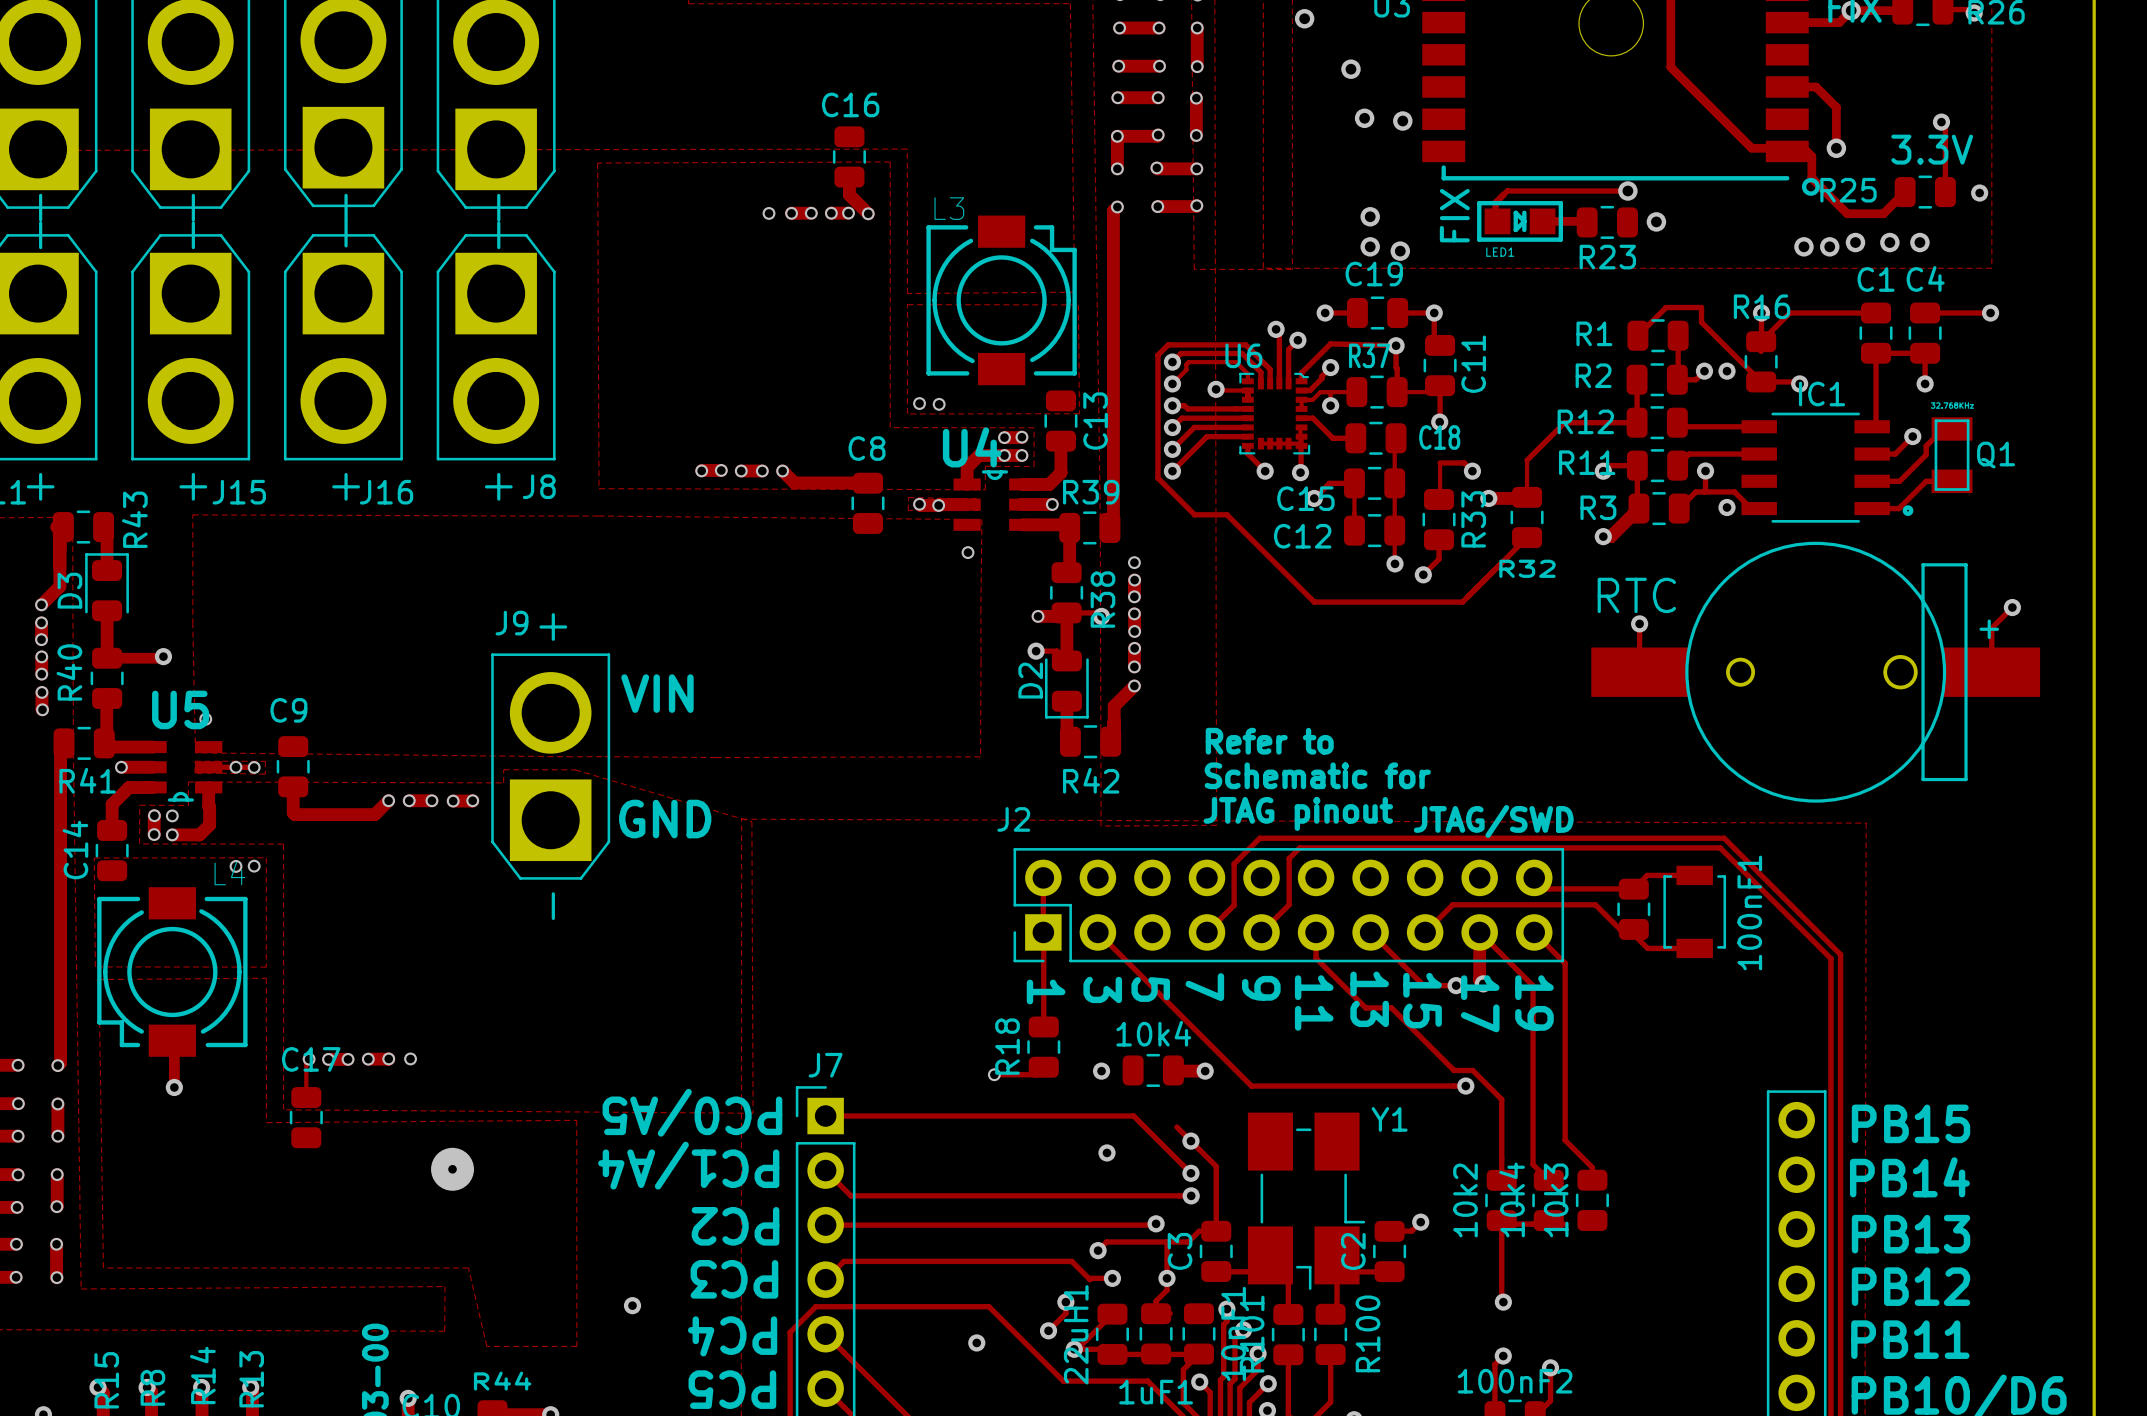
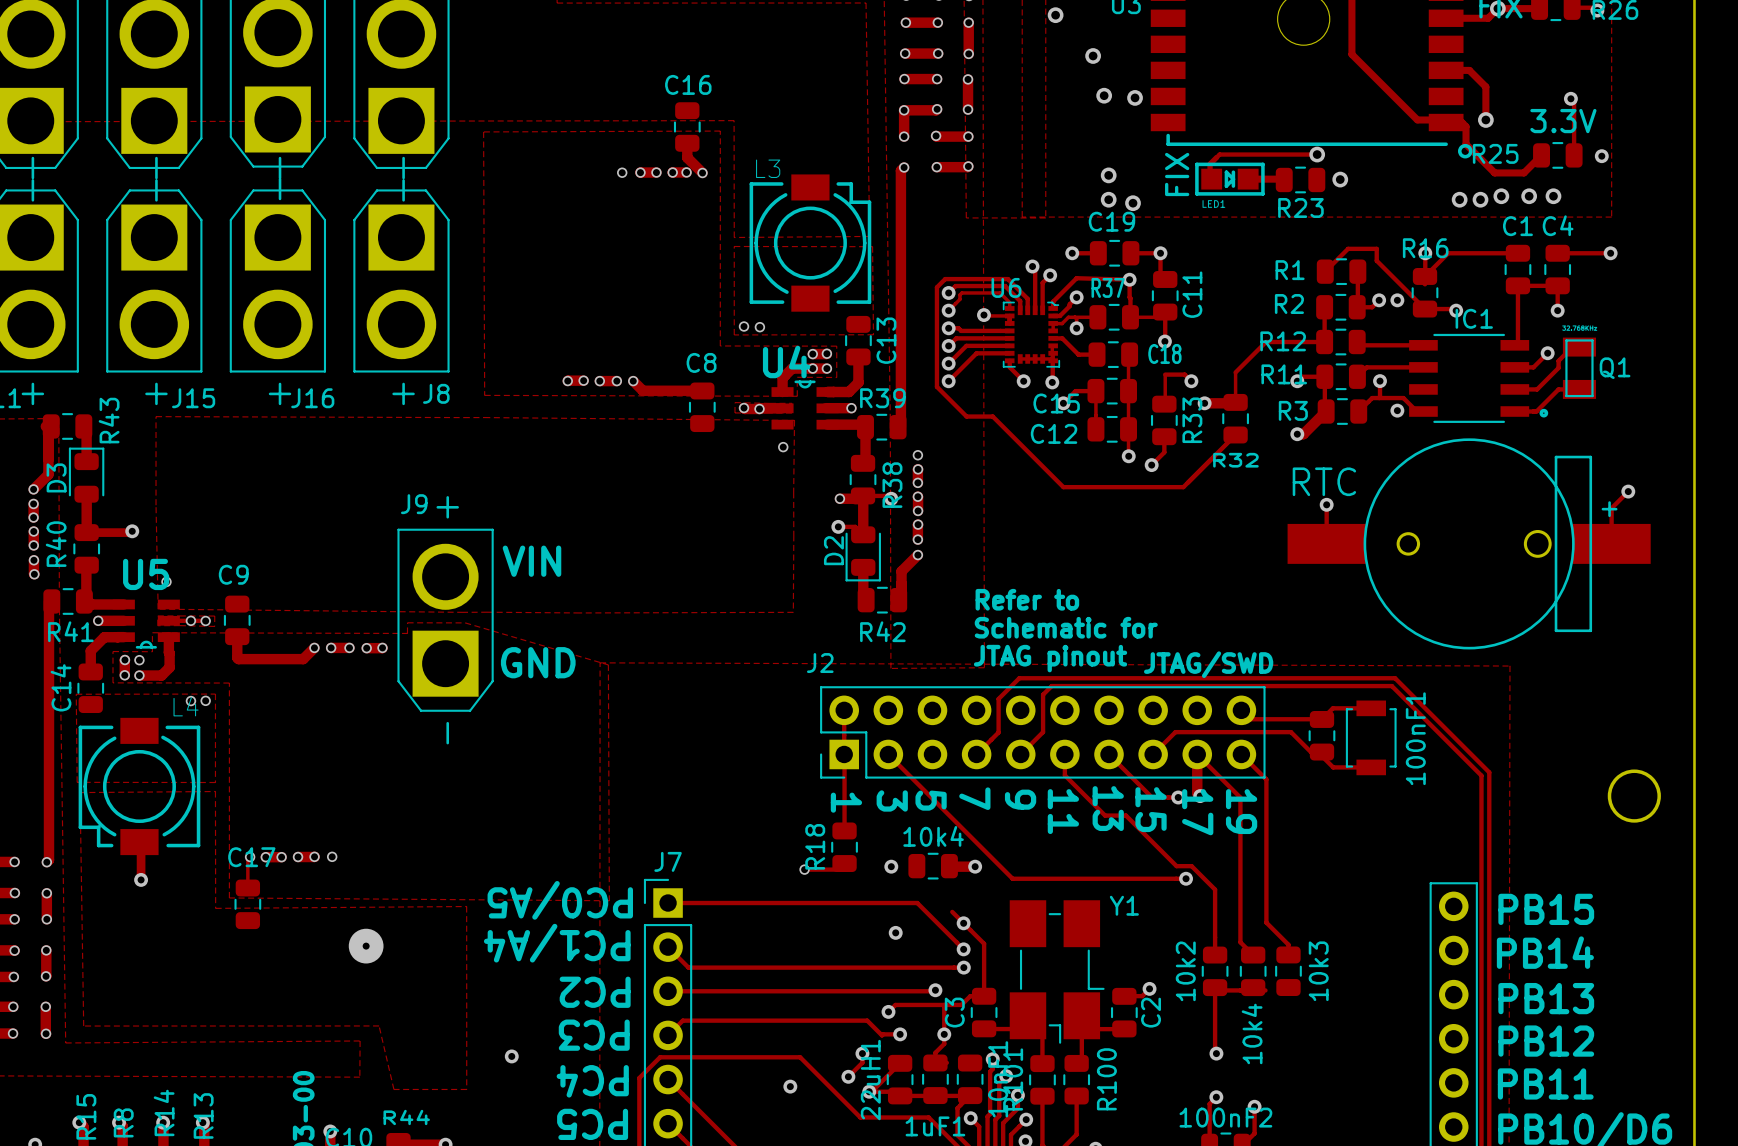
round board edge: none -> [1607, 769, 1661, 823]
10k4 name position: 10k4 (1512, 1199) -> 10k4 (1252, 1033)
10k3 name position: 10k3 (1556, 1200) -> 10k3 (1318, 971)
C2 name position: C2 (1353, 1251) -> C2 (1151, 1012)

